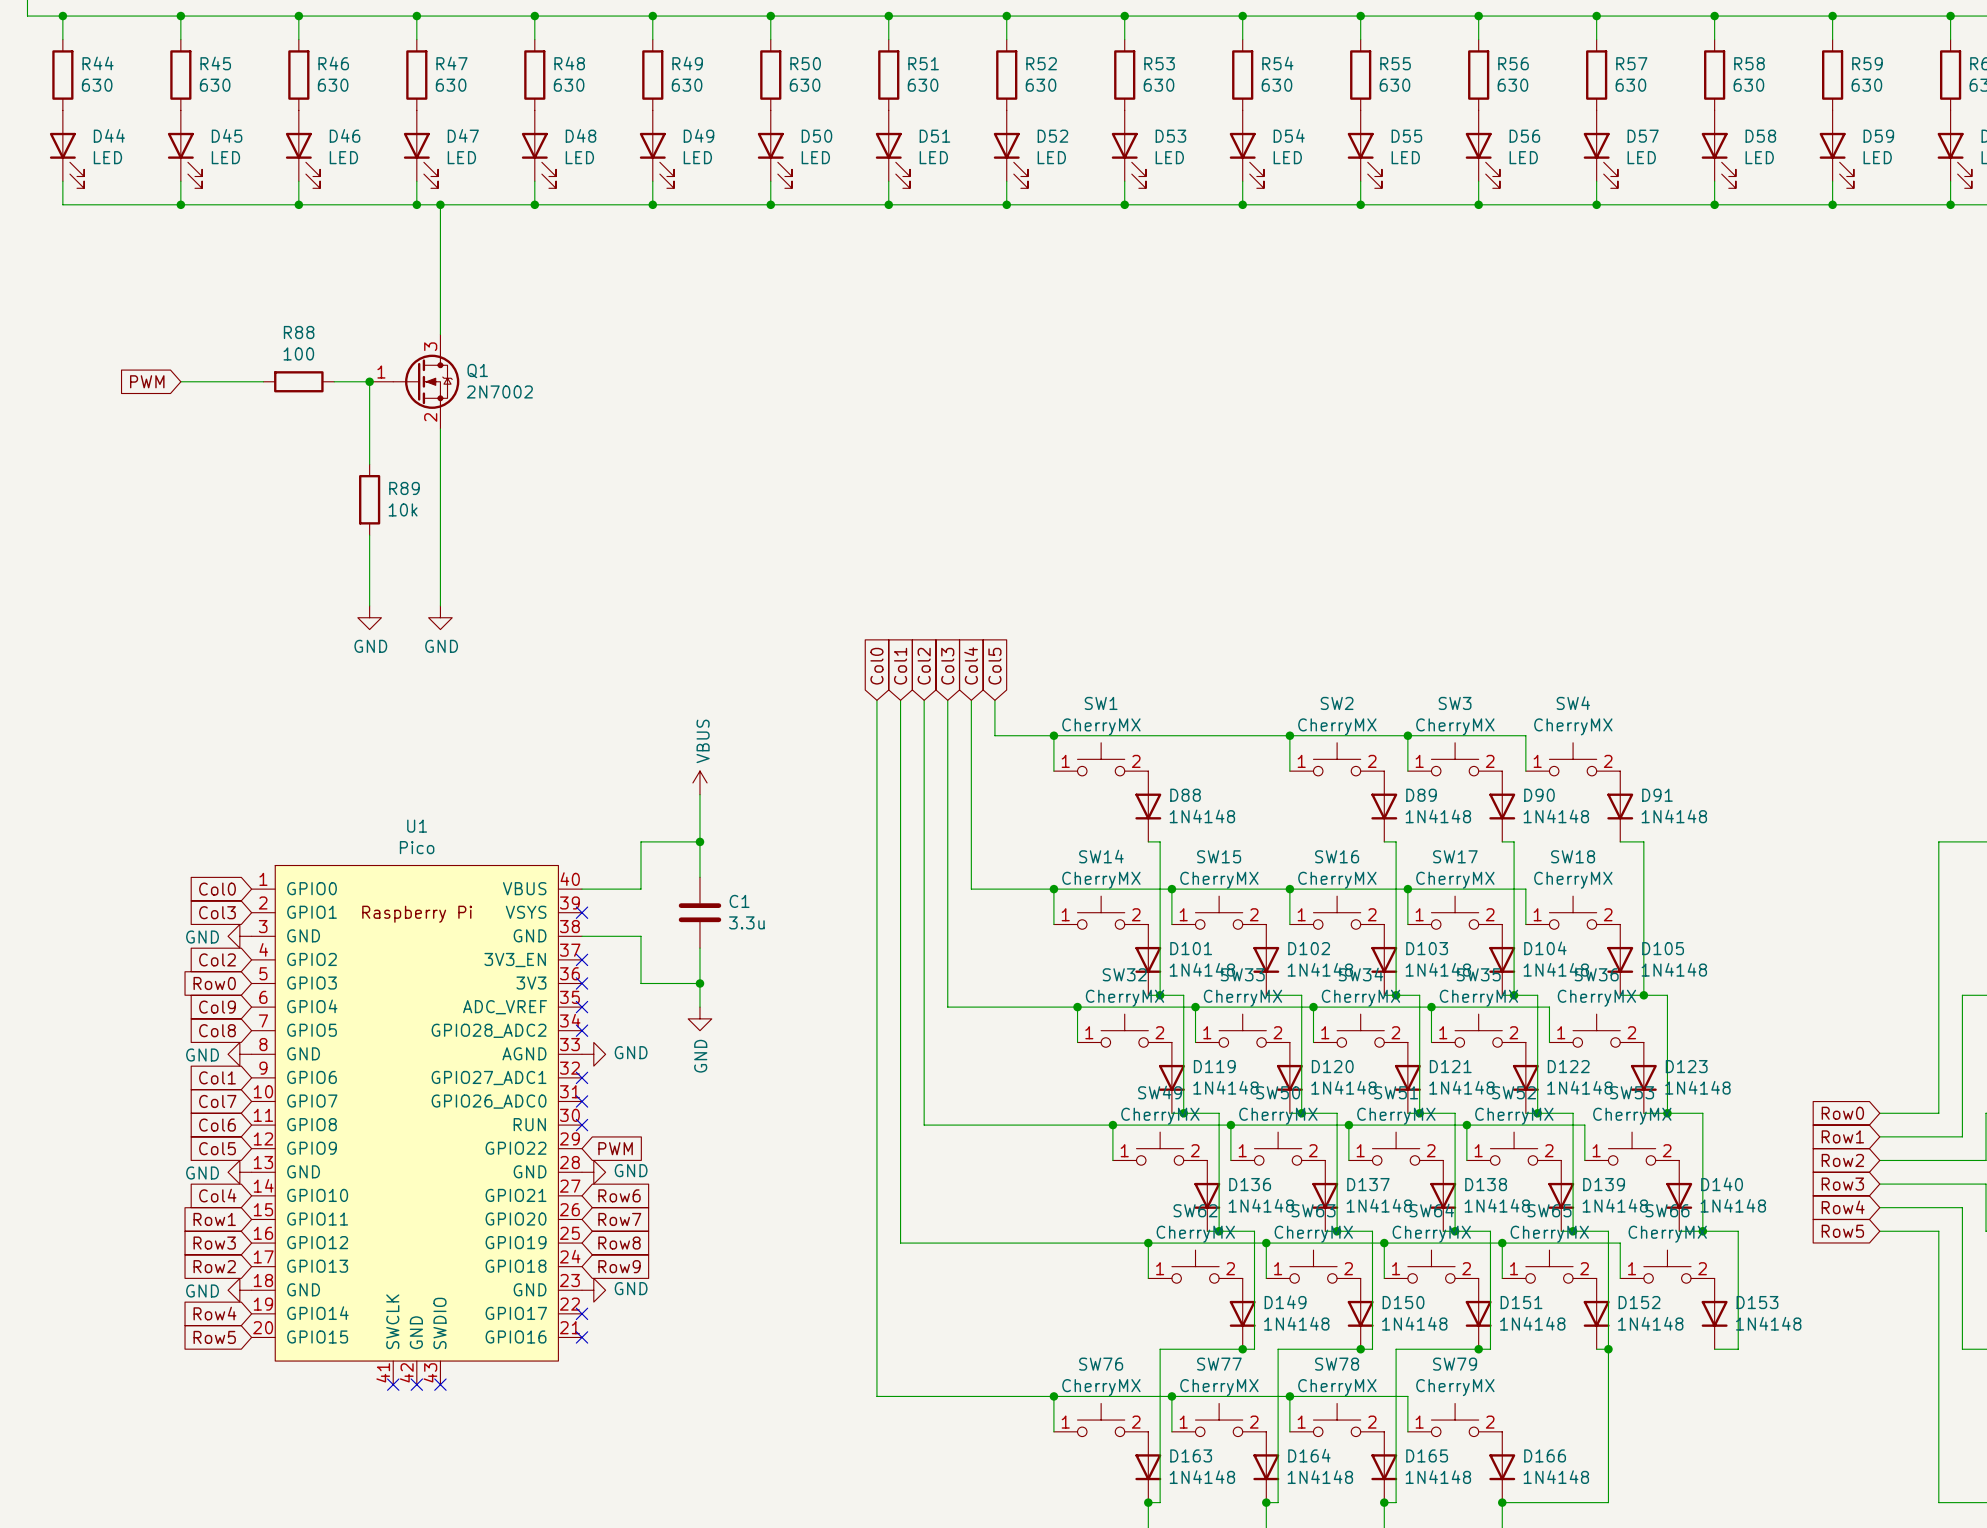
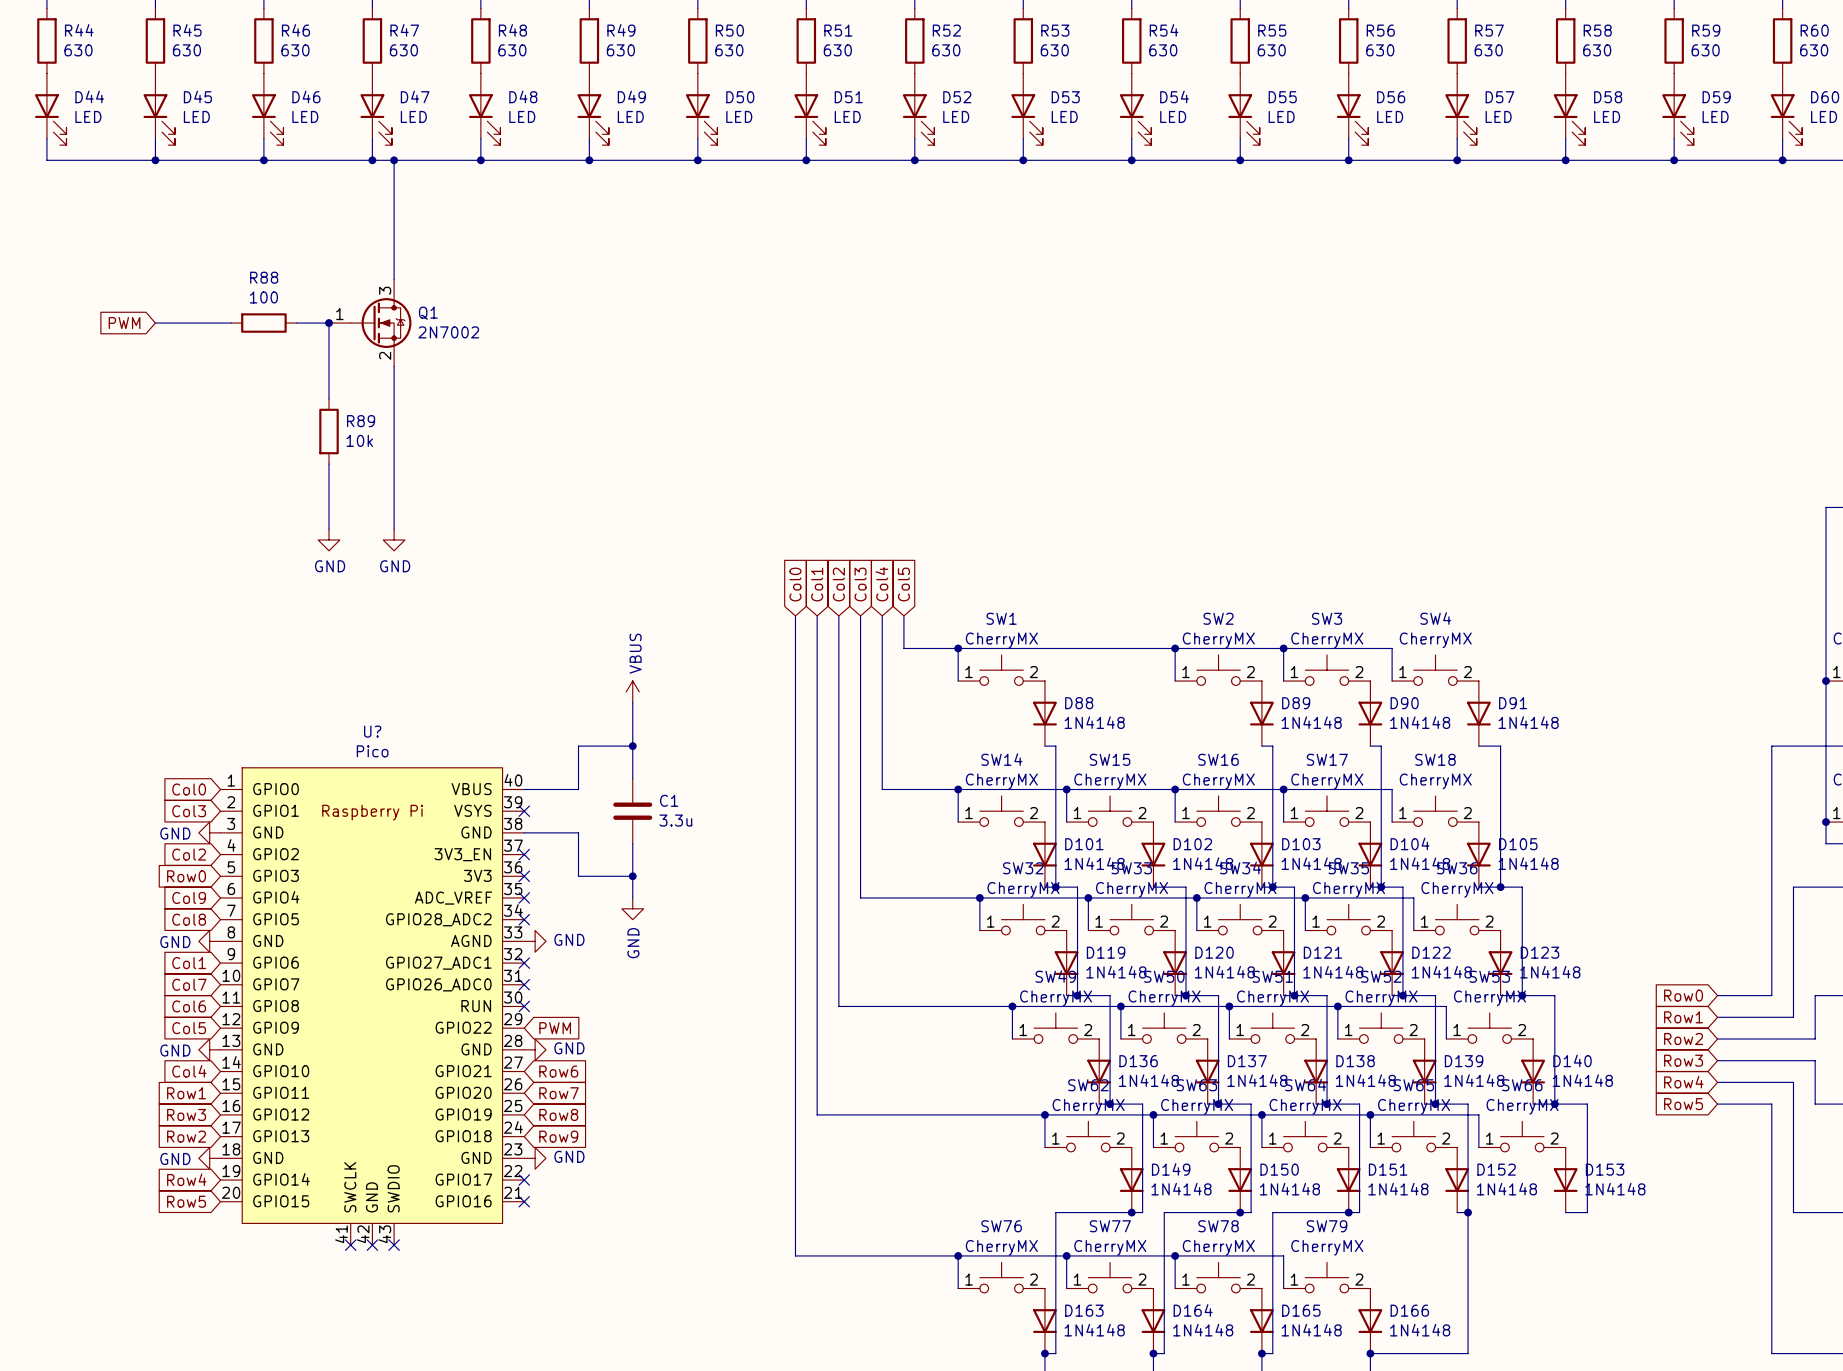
U1 name: U1 (417, 826) -> U? (372, 731)

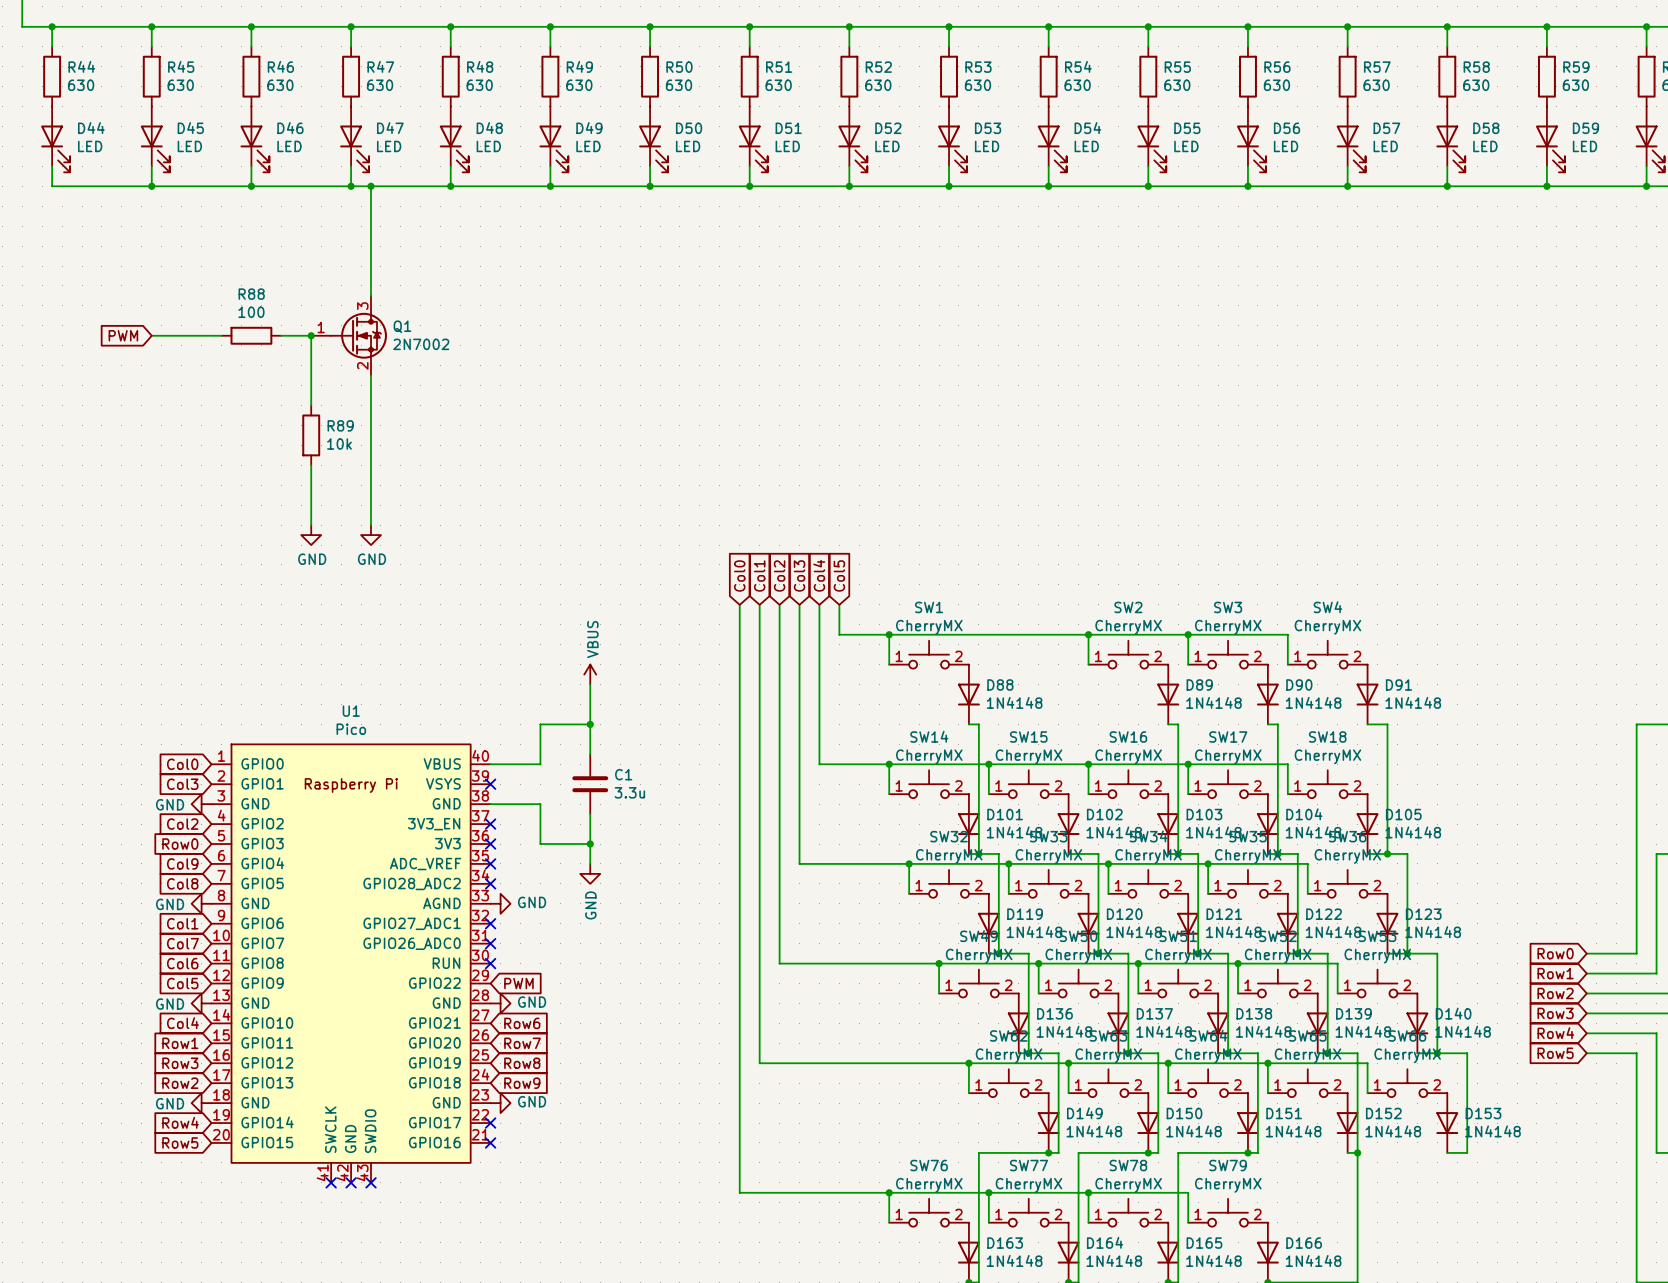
U? name: U? (372, 731) -> U1 (351, 711)

